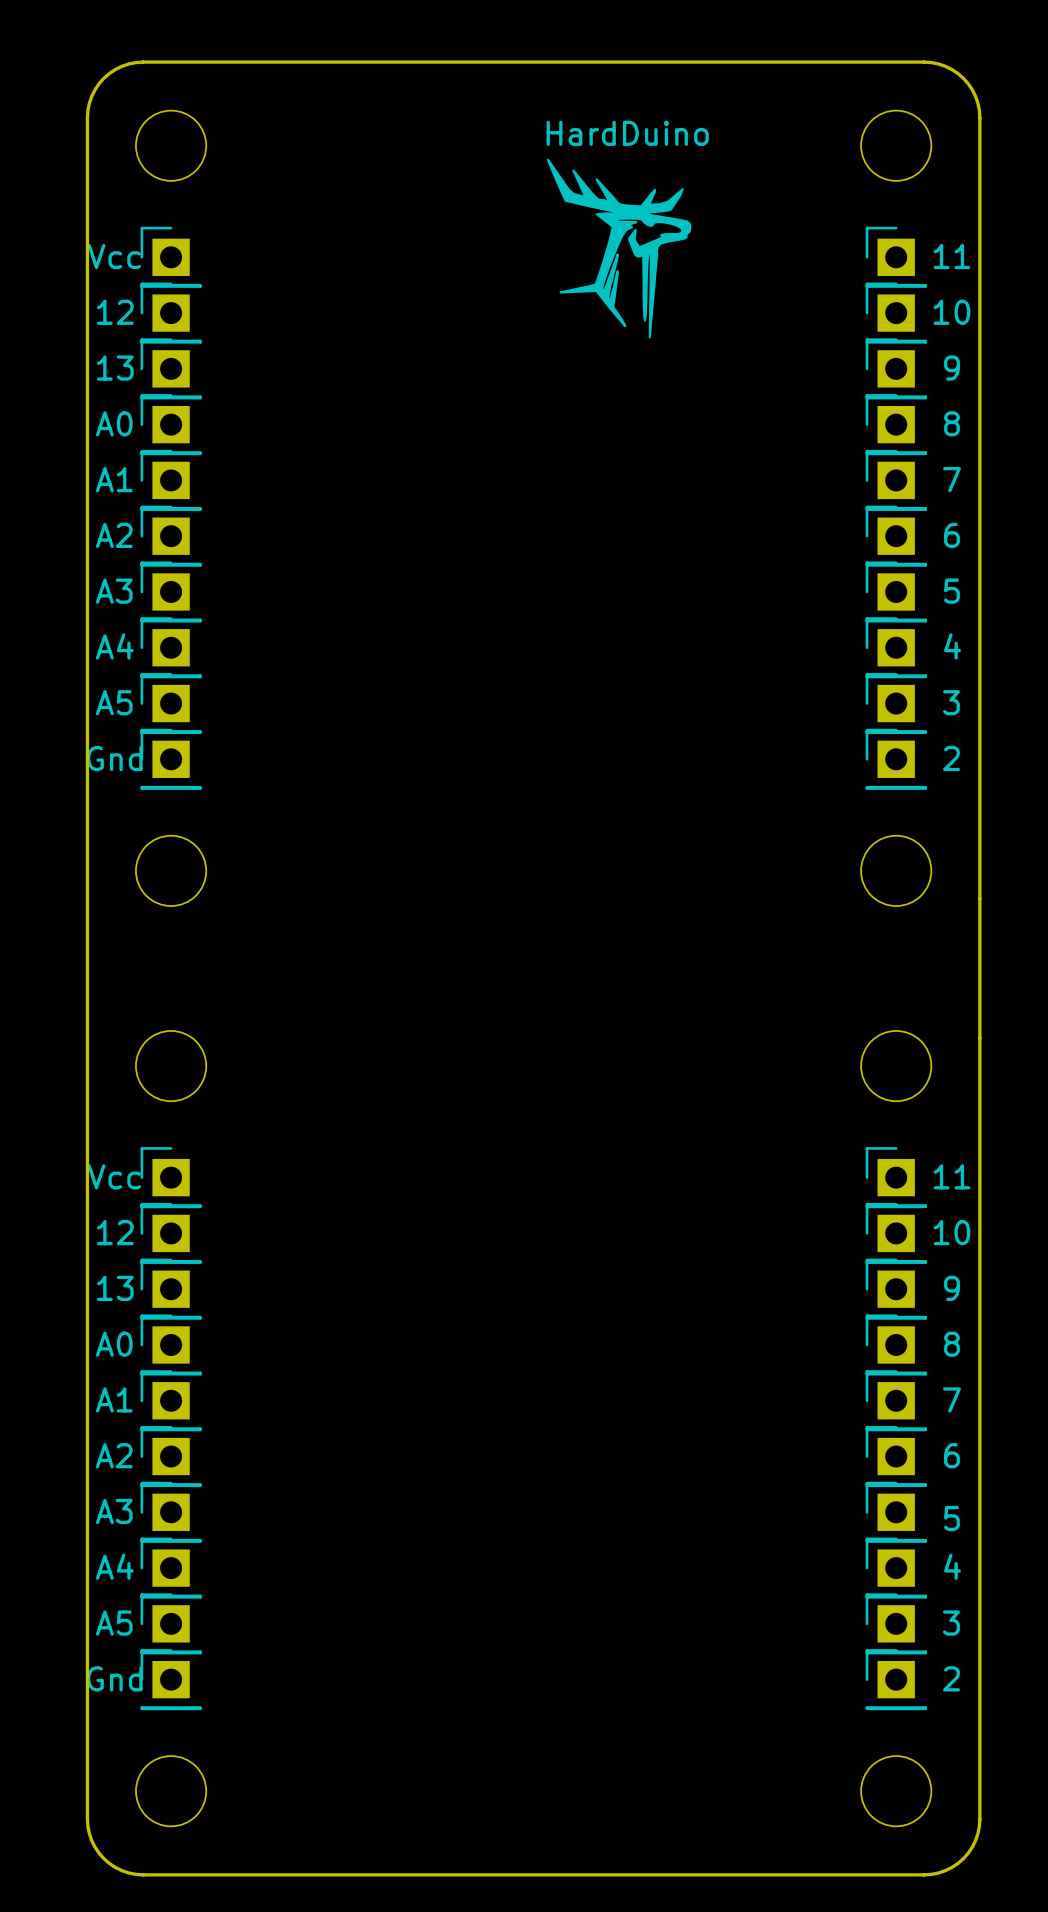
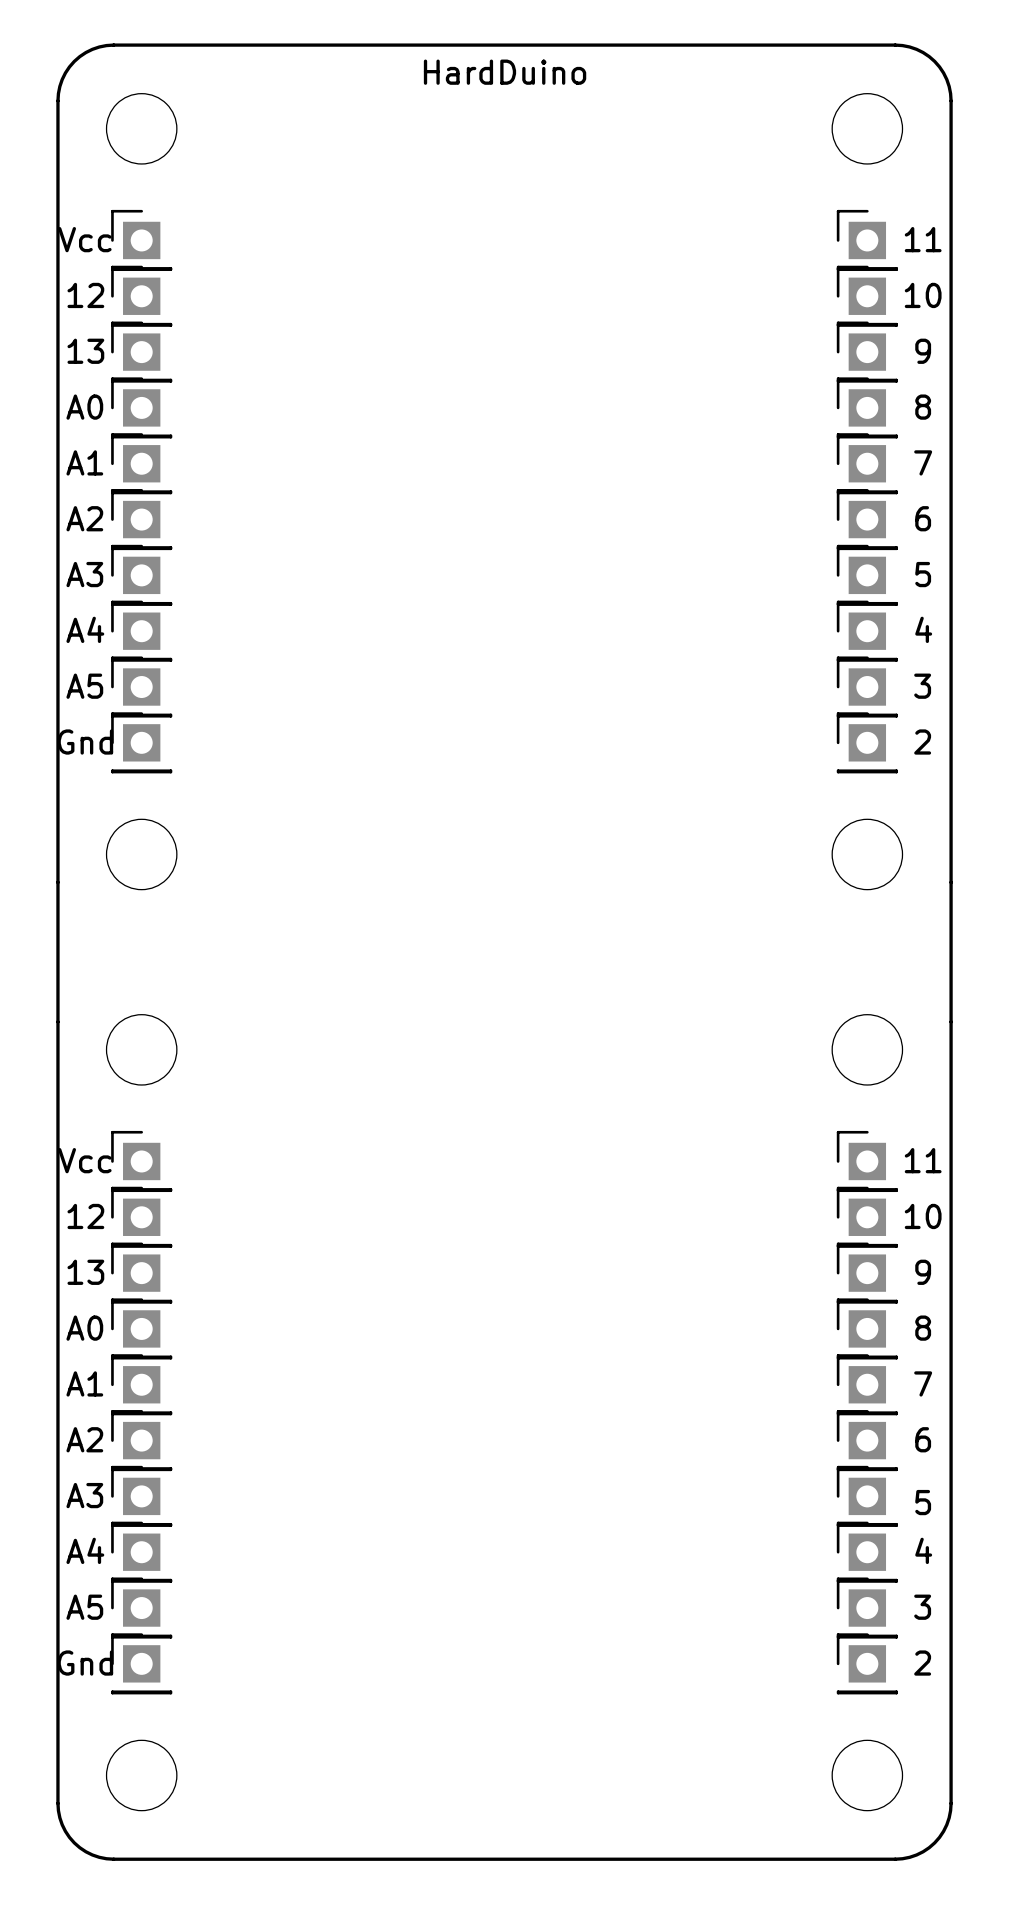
text position: HardDuino (627, 133) -> HardDuino (505, 72)
drawing: [546, 158, 692, 339] -> none

